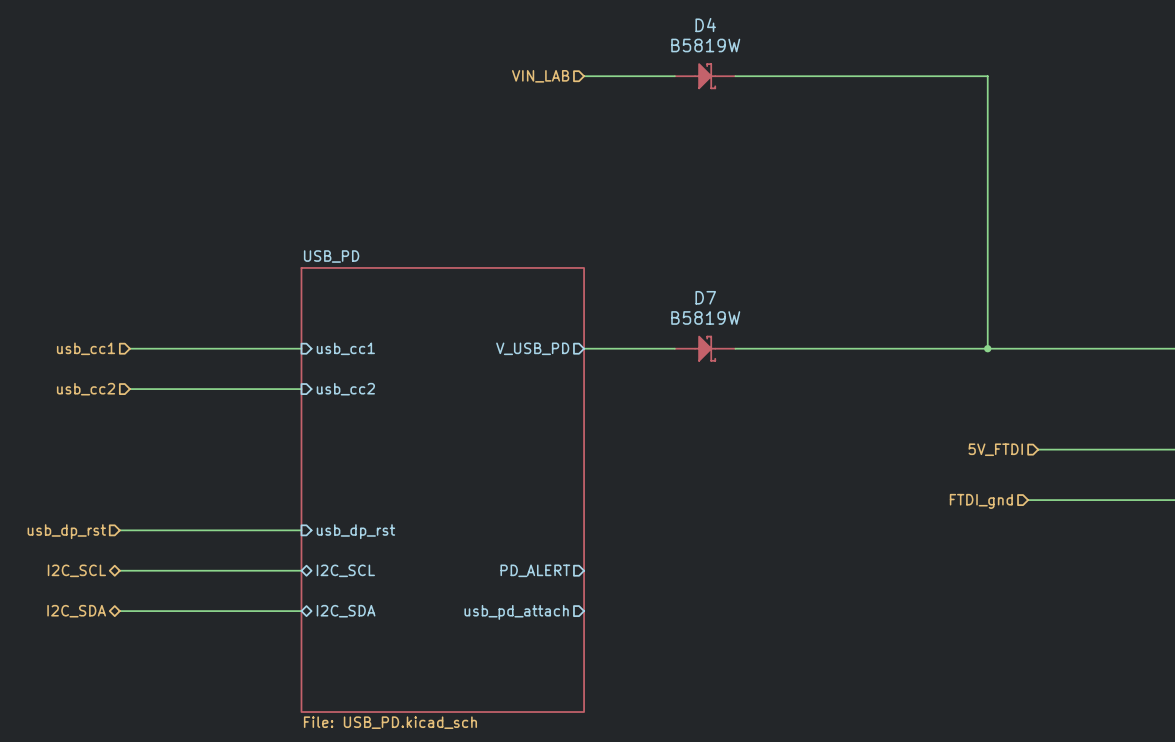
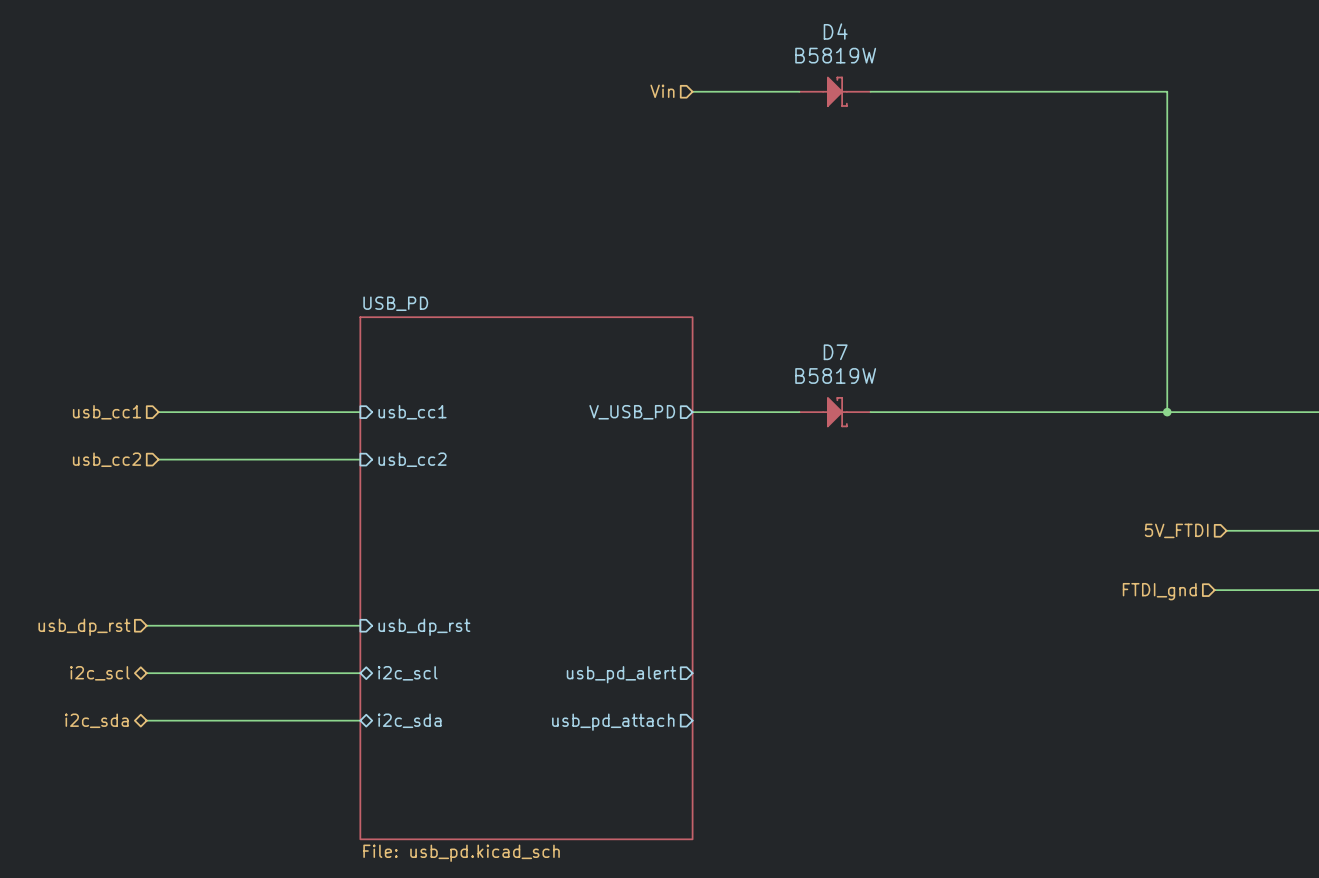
hierarchical label: VIN_LAB (540, 76) -> Vin (662, 91)
hierarchical label: I2C_SCL (76, 570) -> i2c_scl (99, 673)
sheet pin: I2C_SCL (345, 570) -> i2c_scl (407, 673)
sheet pin: PD_ALERT (535, 570) -> usb_pd_alert (621, 674)
hierarchical label: I2C_SDA (76, 611) -> i2c_sda (96, 720)
sheet pin: I2C_SDA (346, 611) -> i2c_sda (409, 720)
sheet USB_PD value: File: USB_PD.kicad_sch (390, 722) -> File: usb_pd.kicad_sch (461, 853)

